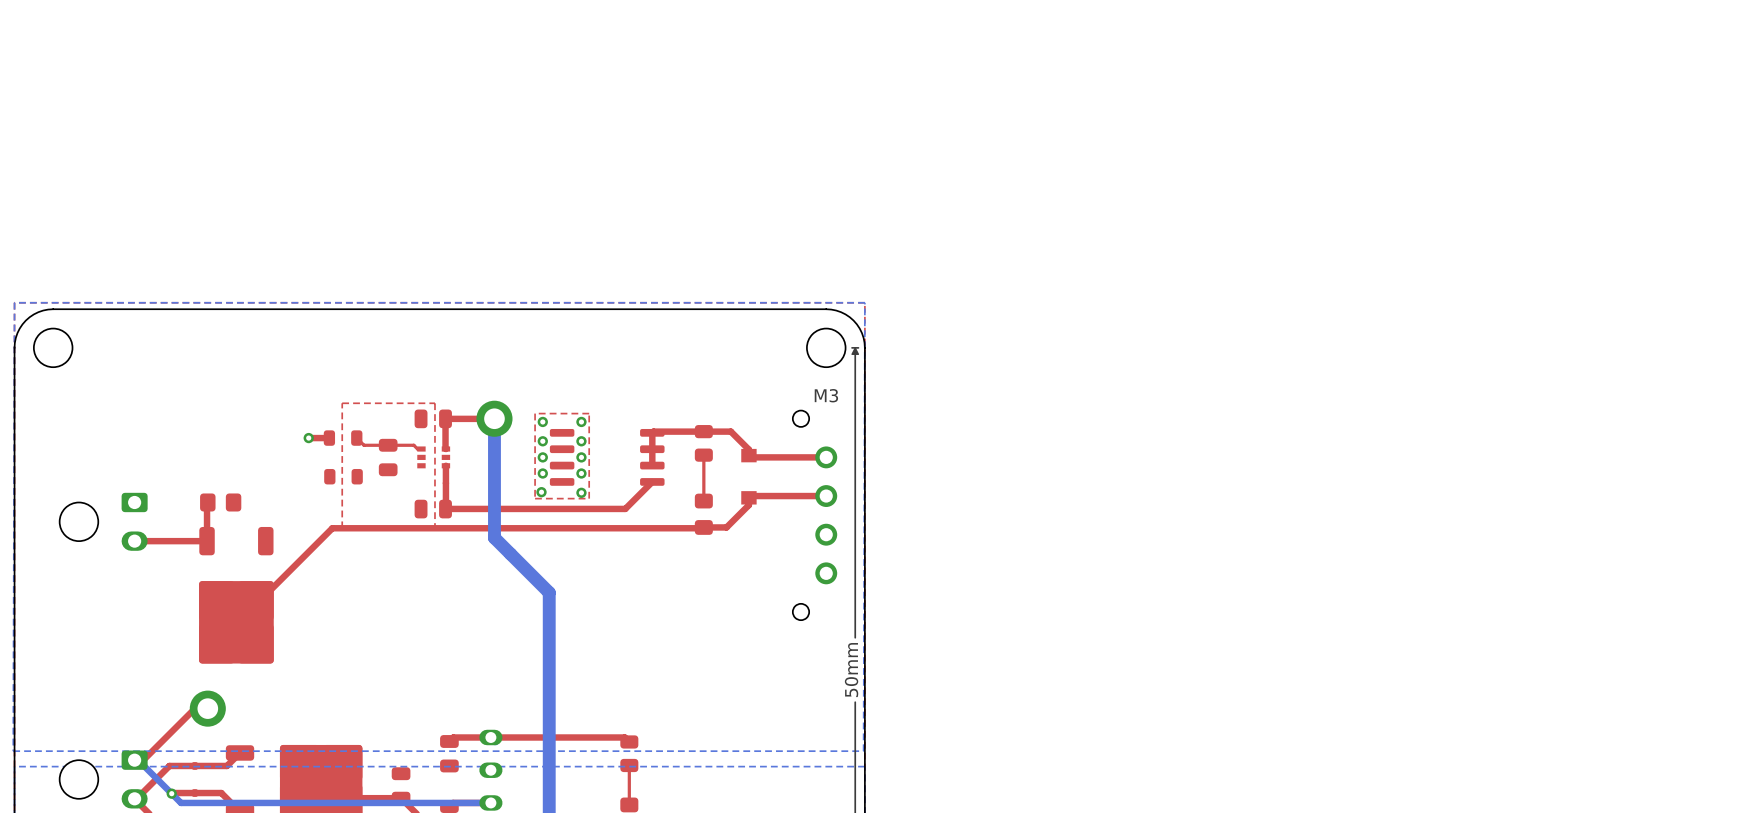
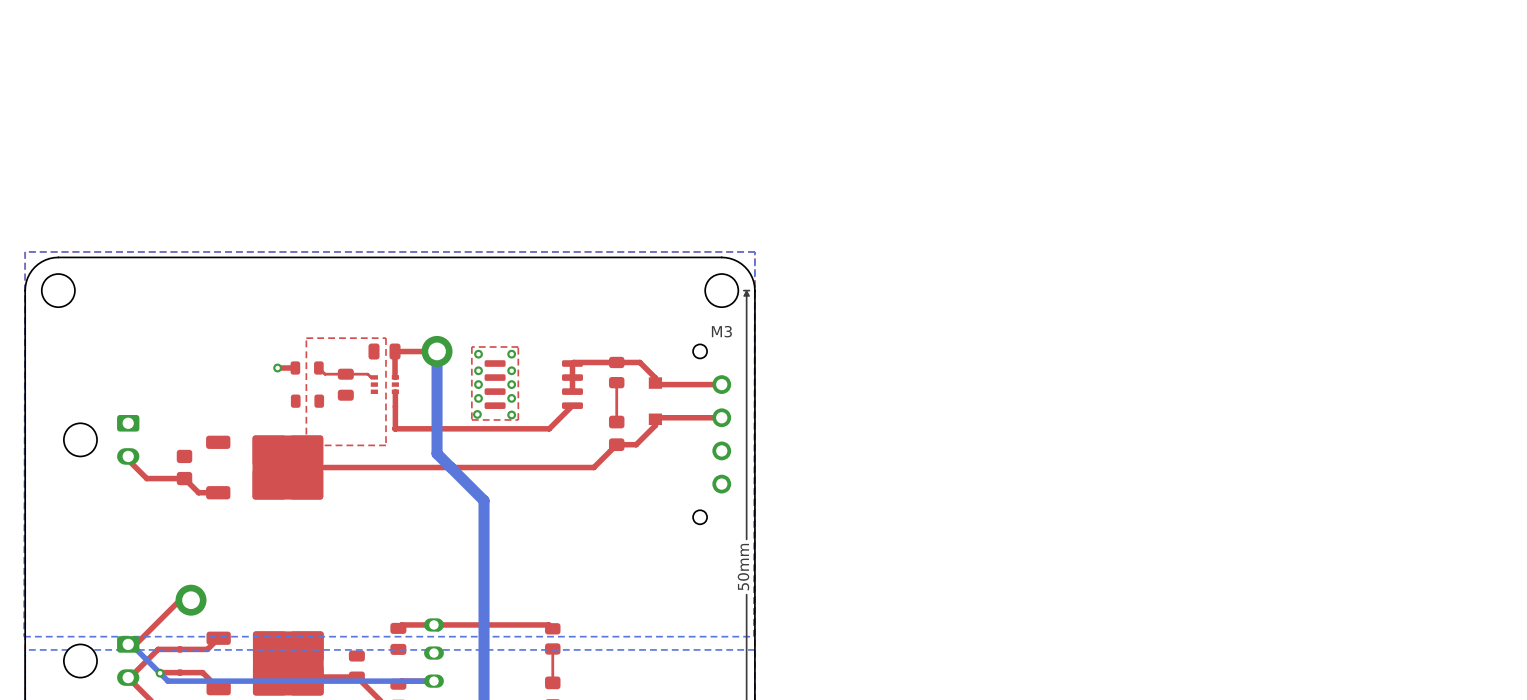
top track: (207, 502) (207, 541) (134, 541) -> (218, 492) (198, 492) (184, 478) (146, 478) (128, 459) (128, 456)
part rotation: 0° (220, 502) -> 90° clockwise (184, 467)
part position: (220, 502) -> (184, 467)
part: (433, 509) -> none
top track: (703, 528) (332, 528) (216, 643) -> (616, 445) (593, 467) (287, 467)
part rotation: 0° (236, 595) -> 90° counterclockwise (264, 467)

